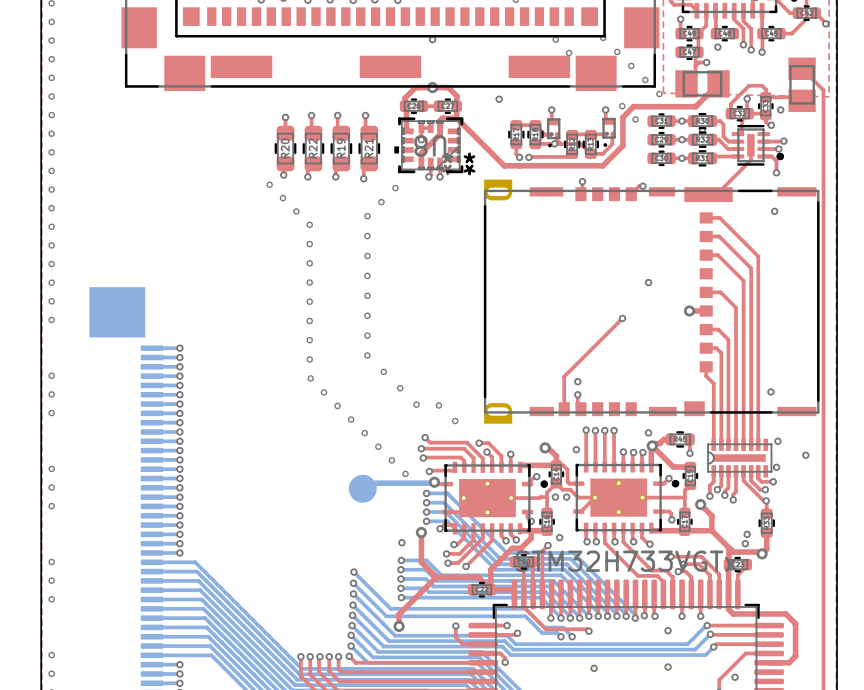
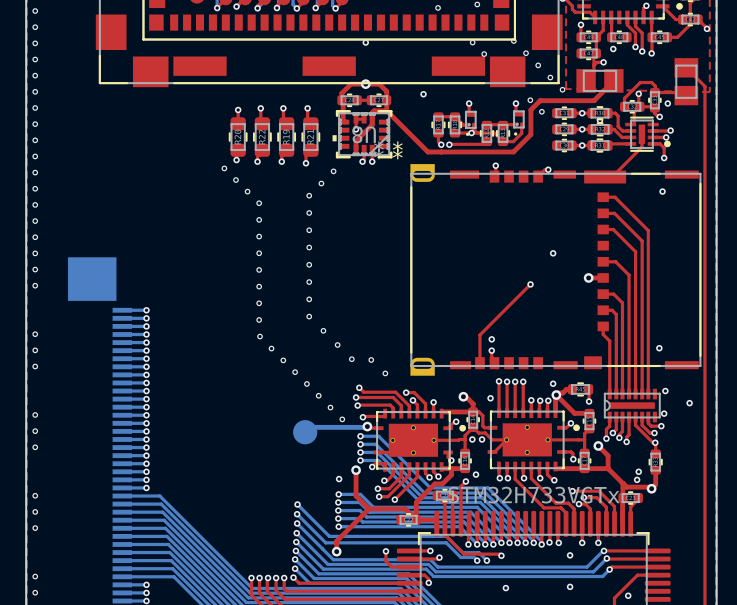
top track: (728, 594) (728, 609) (733, 613) (785, 613) (795, 623) (795, 656) (789, 662) (769, 662) -> none

